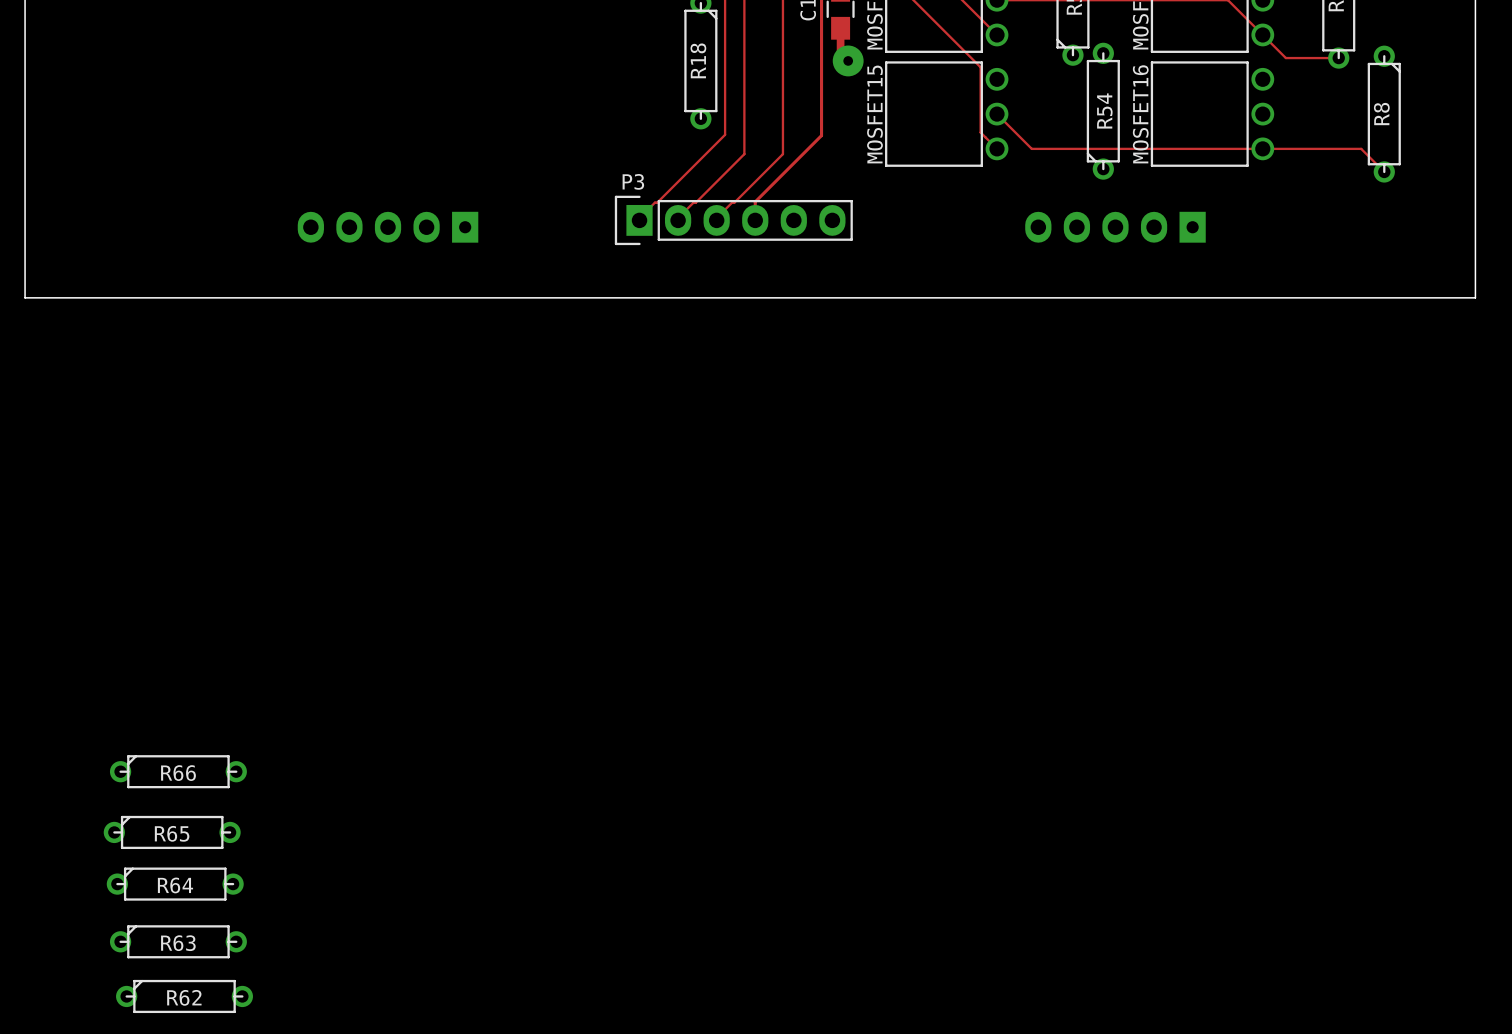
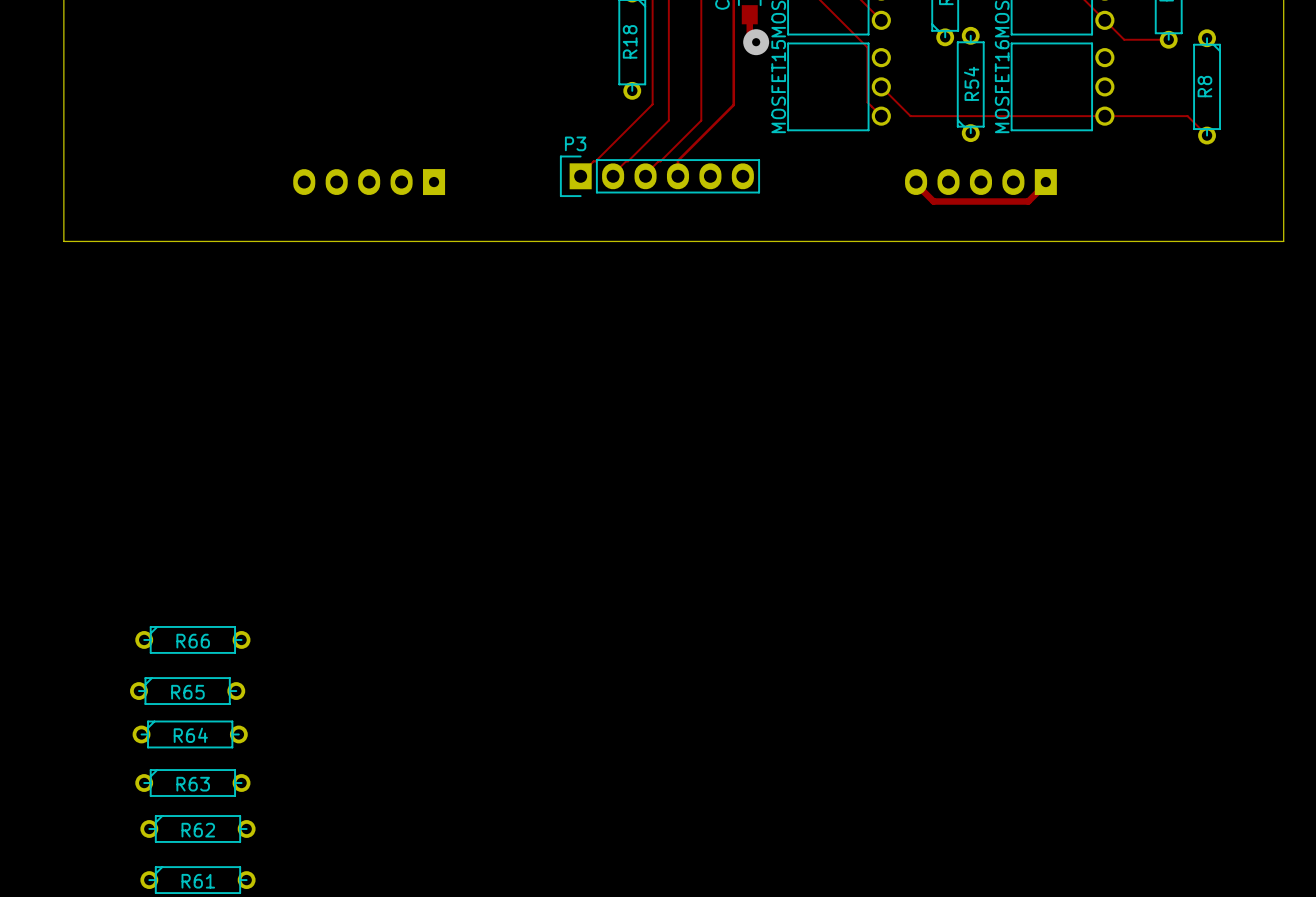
track: none -> (916, 182) (933, 201) (1028, 201) (1045, 182)

